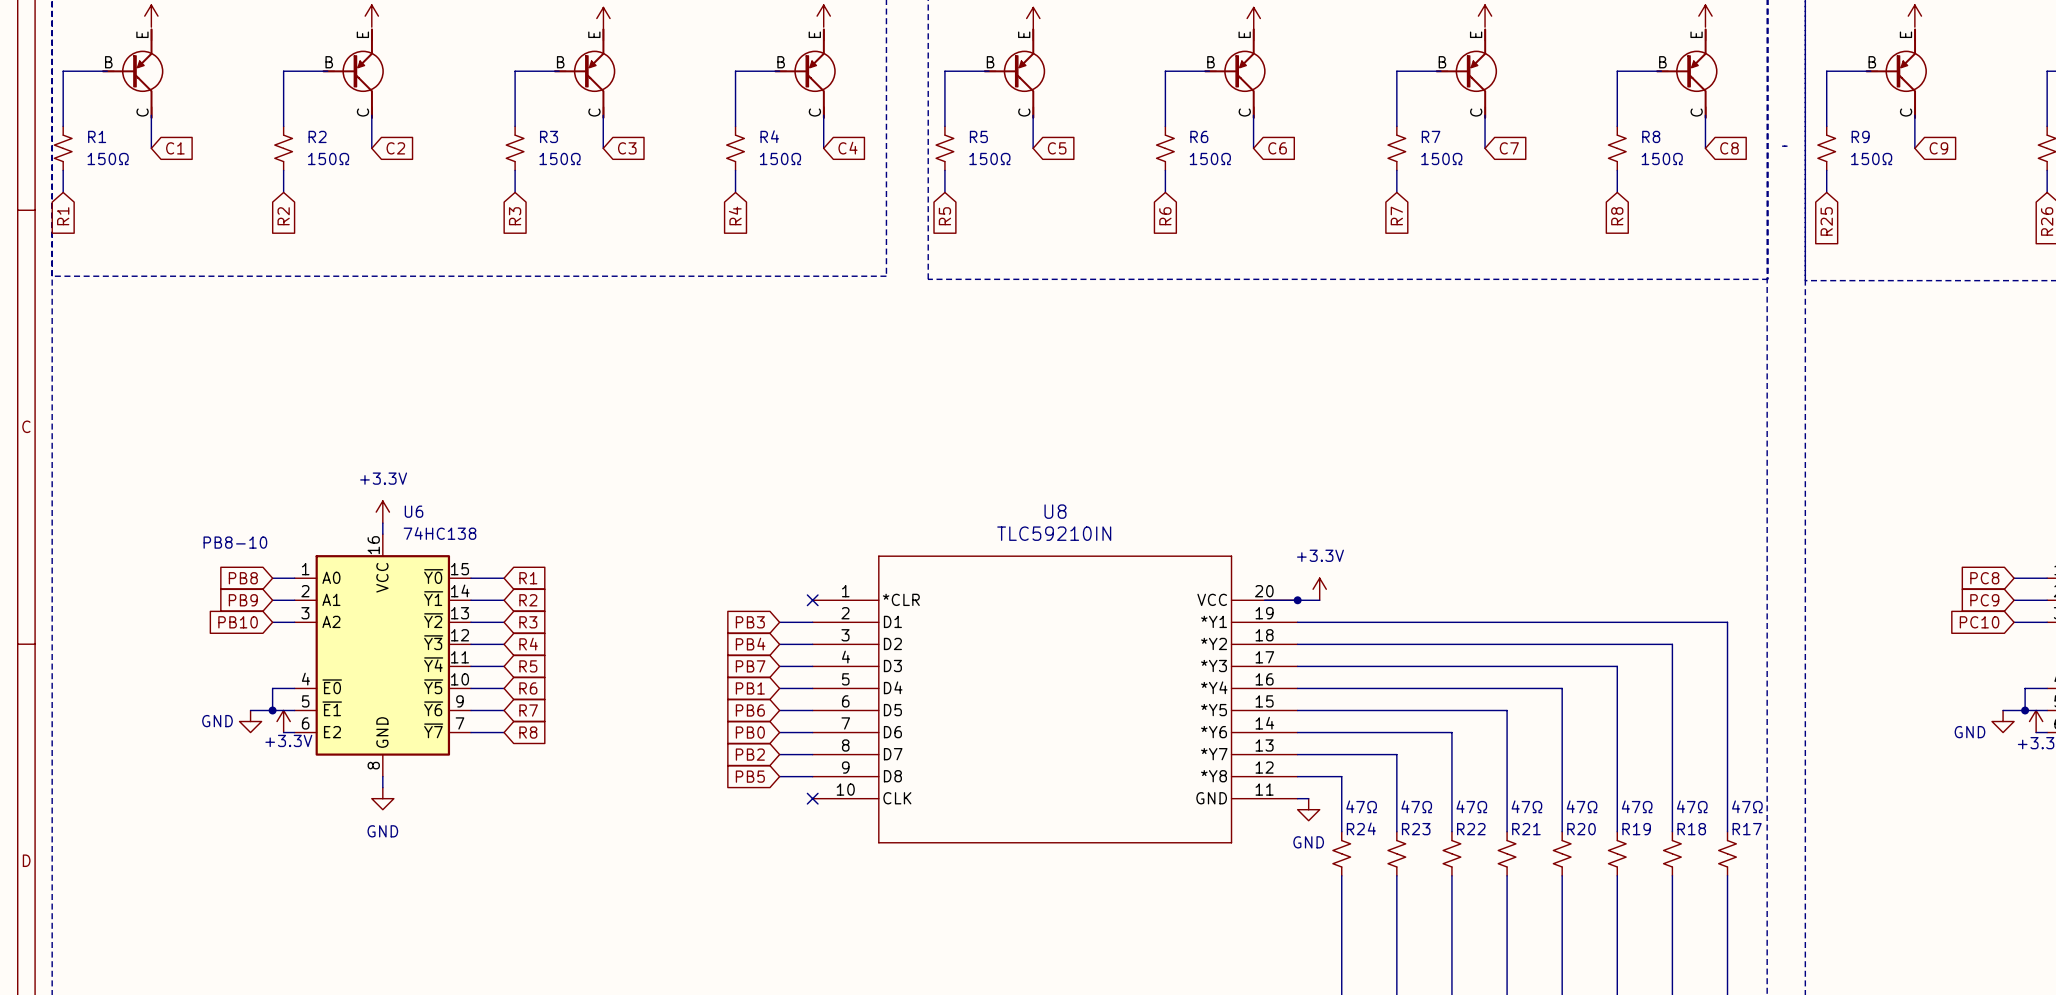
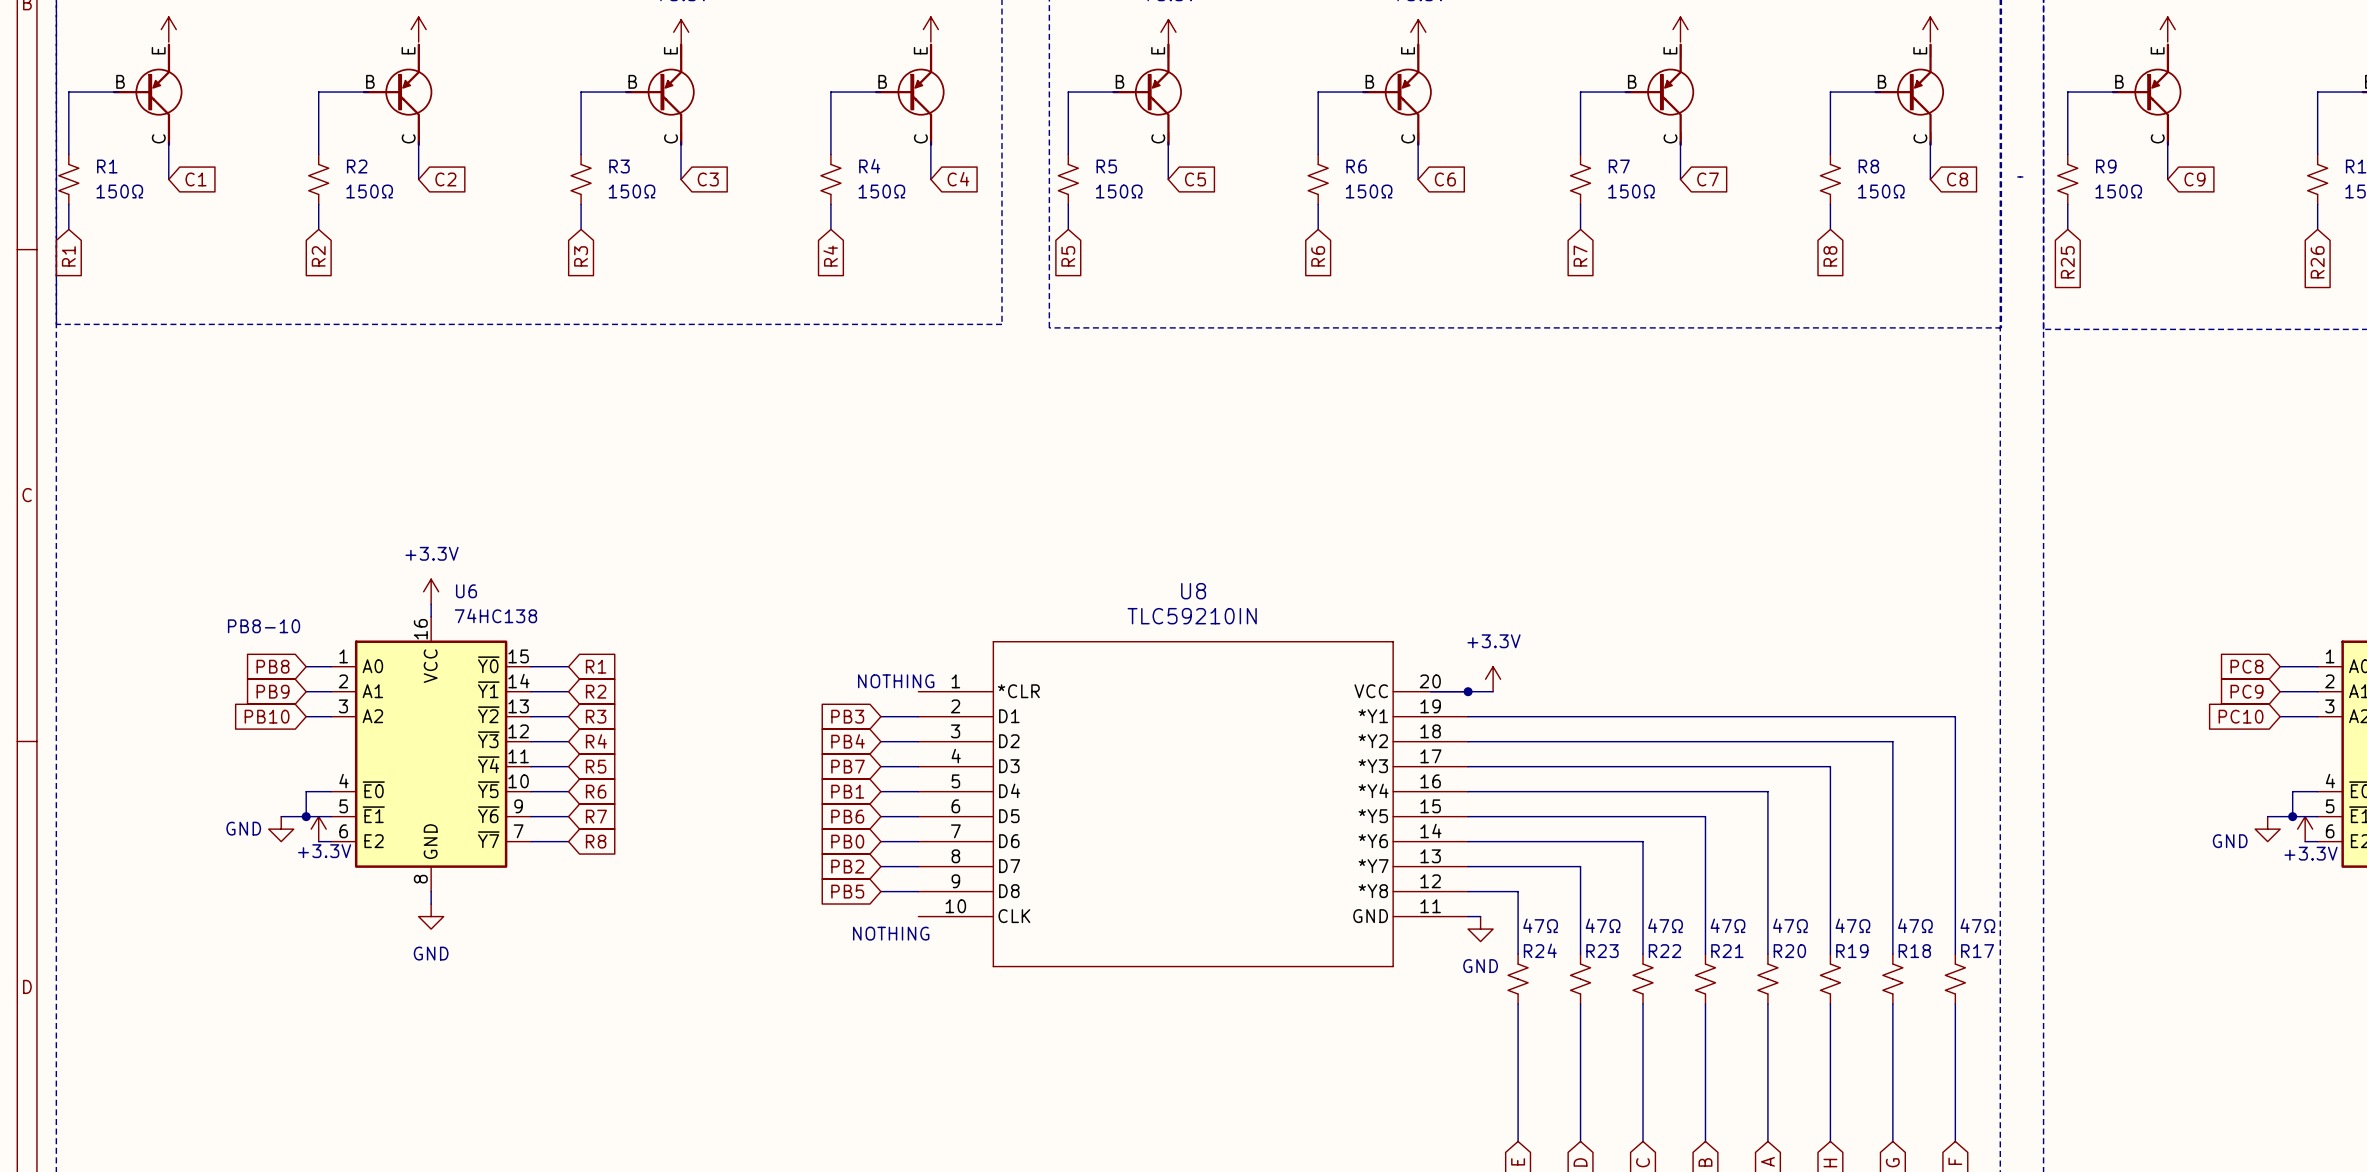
text: none -> NOTHING (896, 681)
no-connect mark: (812, 600) -> none
no-connect mark: (812, 798) -> none
text: none -> NOTHING (891, 933)

